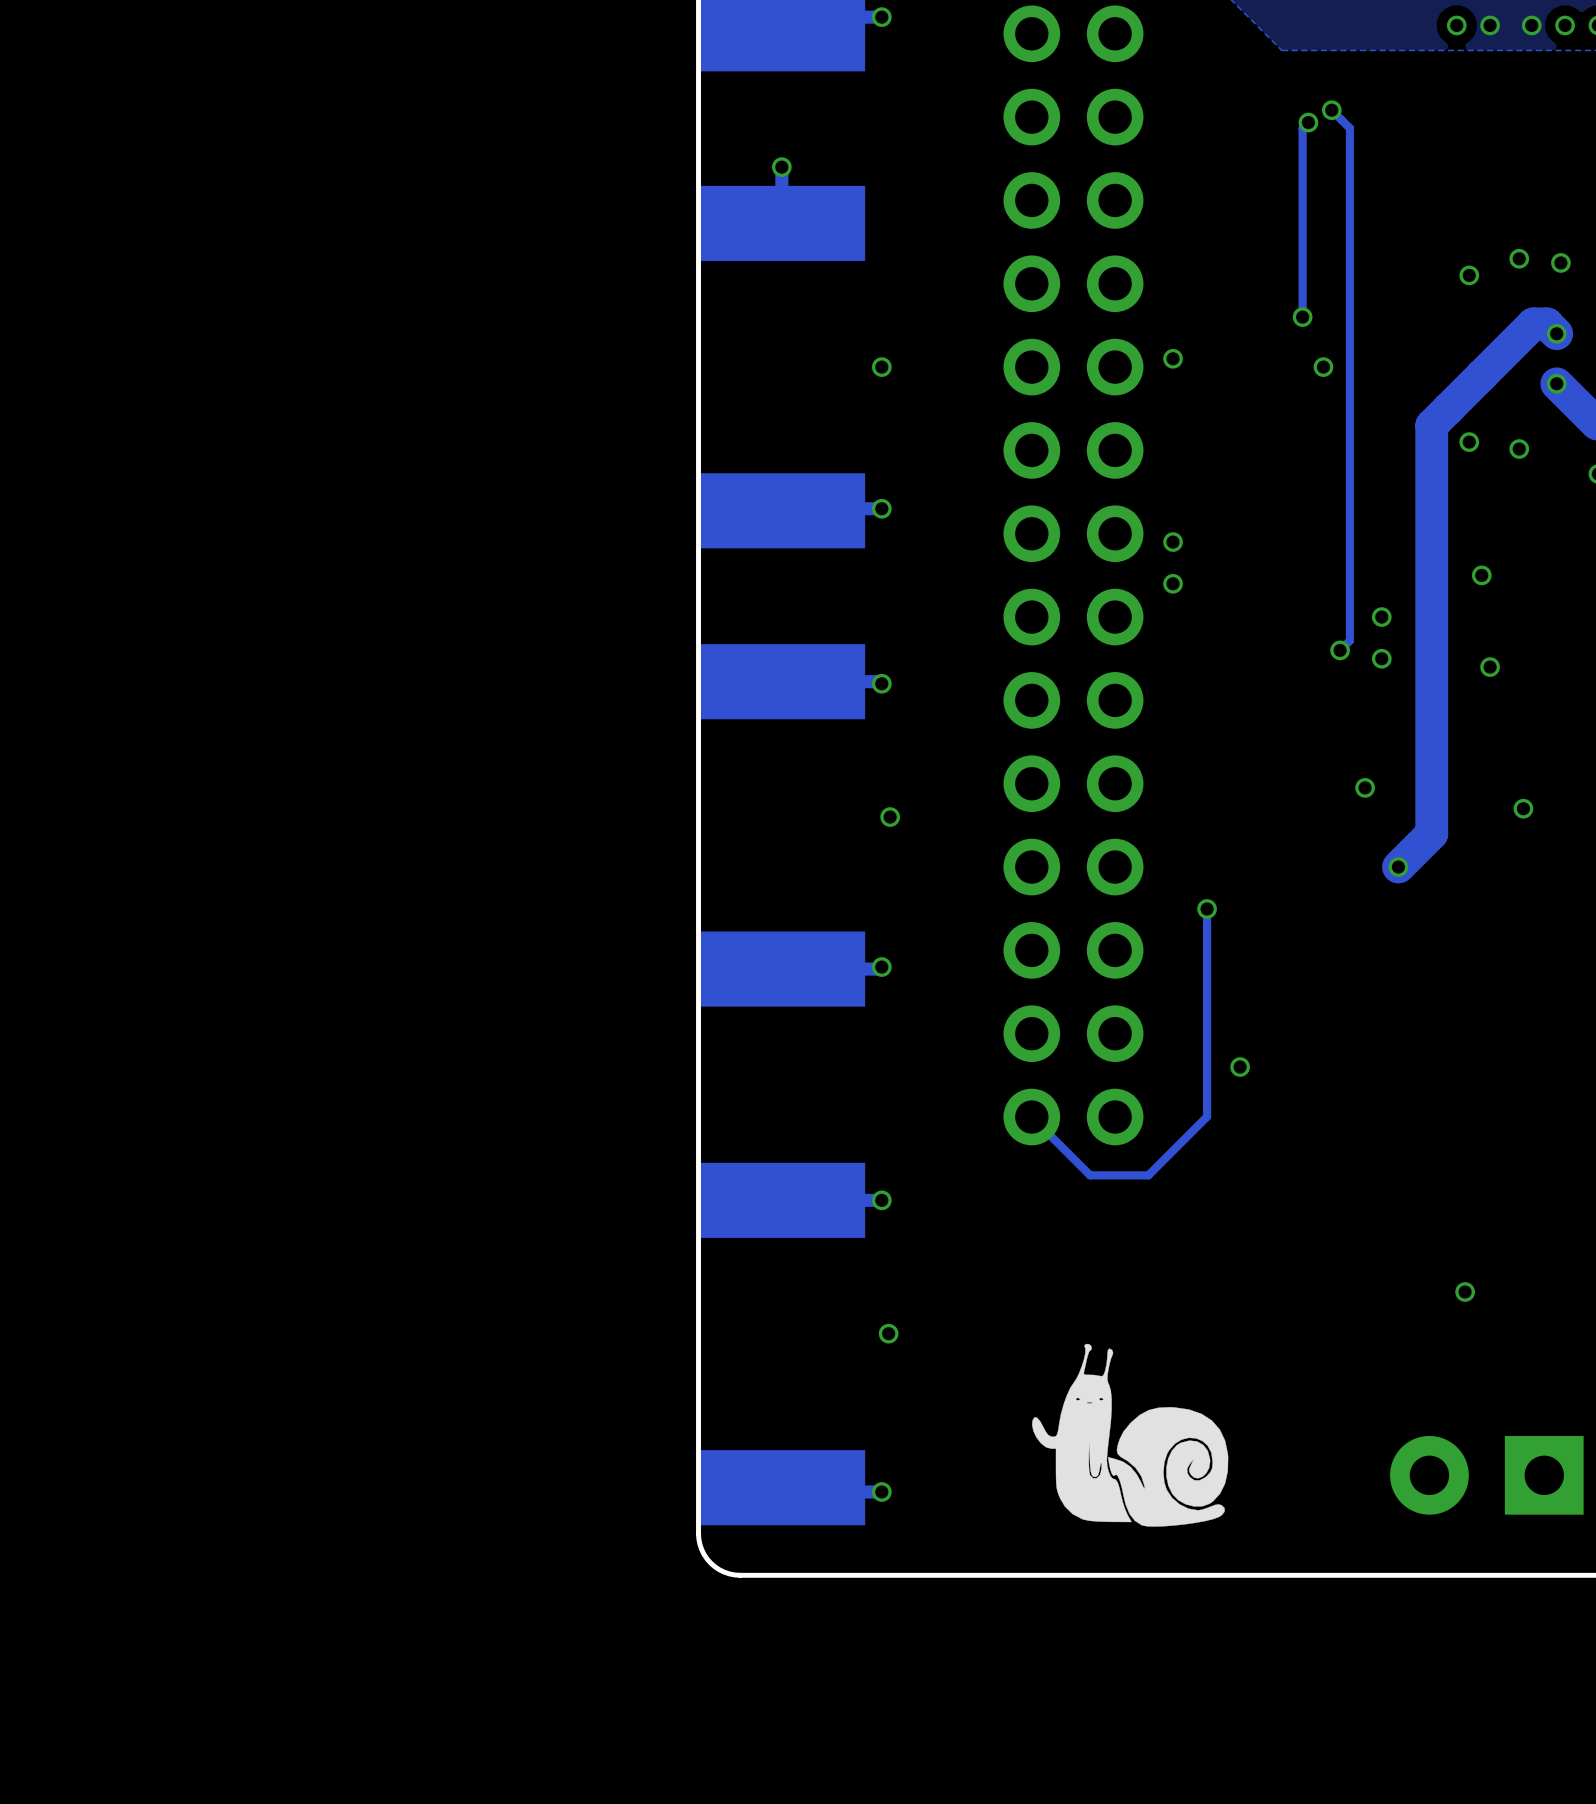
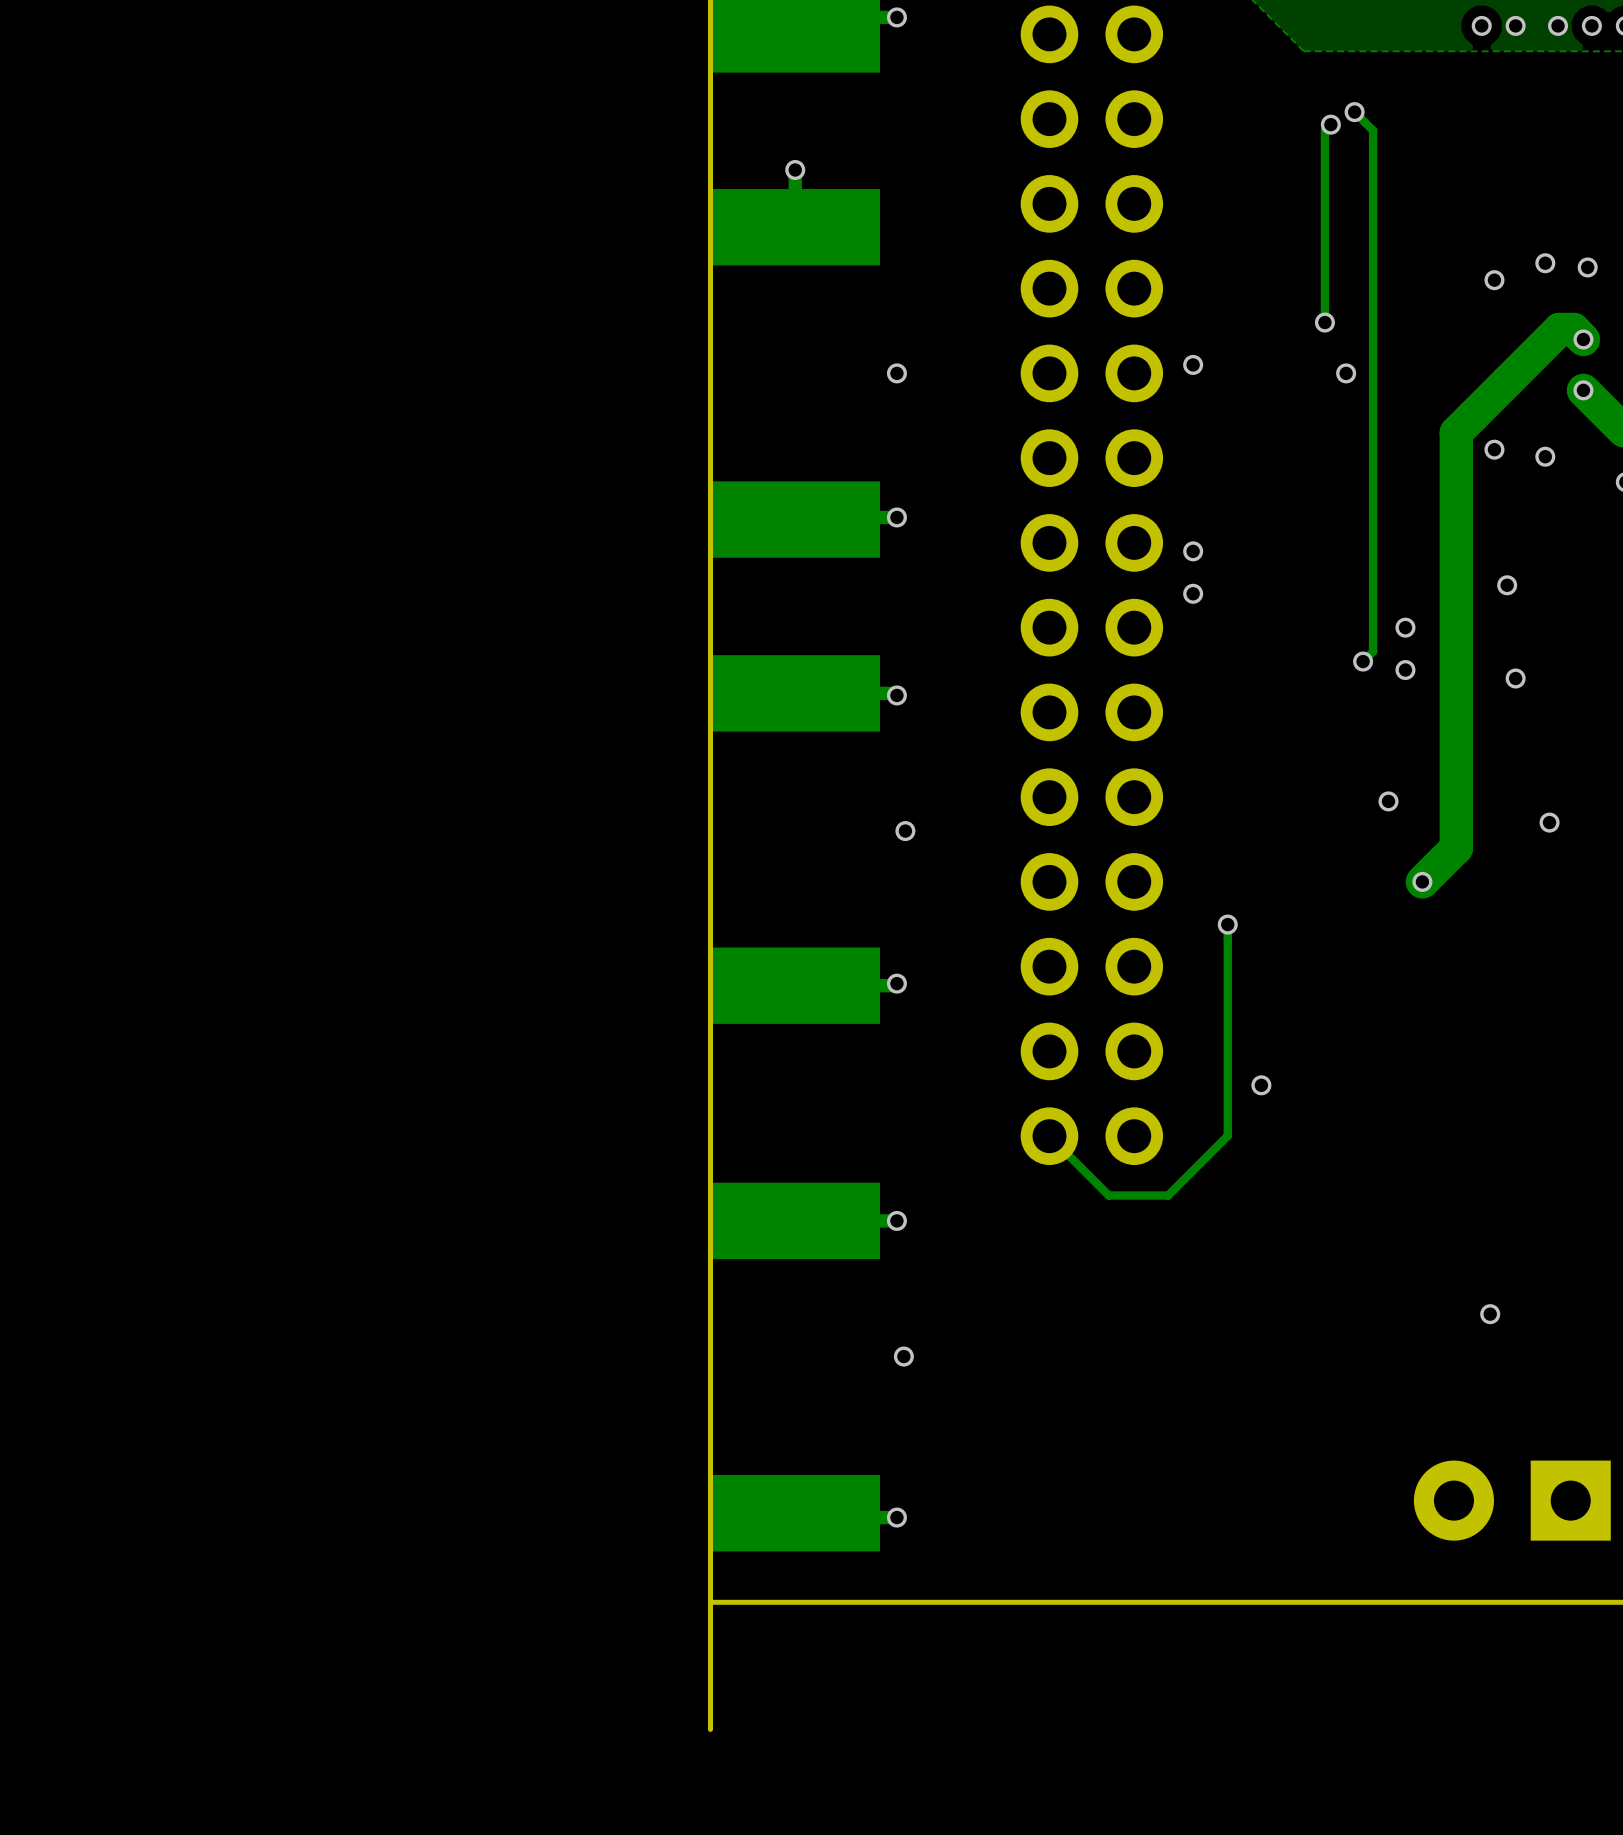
drawing: [1031, 1343, 1229, 1527] -> none
board edge: (698, 1533) (701, 1549) (710, 1563) (724, 1572) (740, 1575) -> (710, 1602) (752, 1602)
board edge: none -> (710, 1559) (710, 1729)

